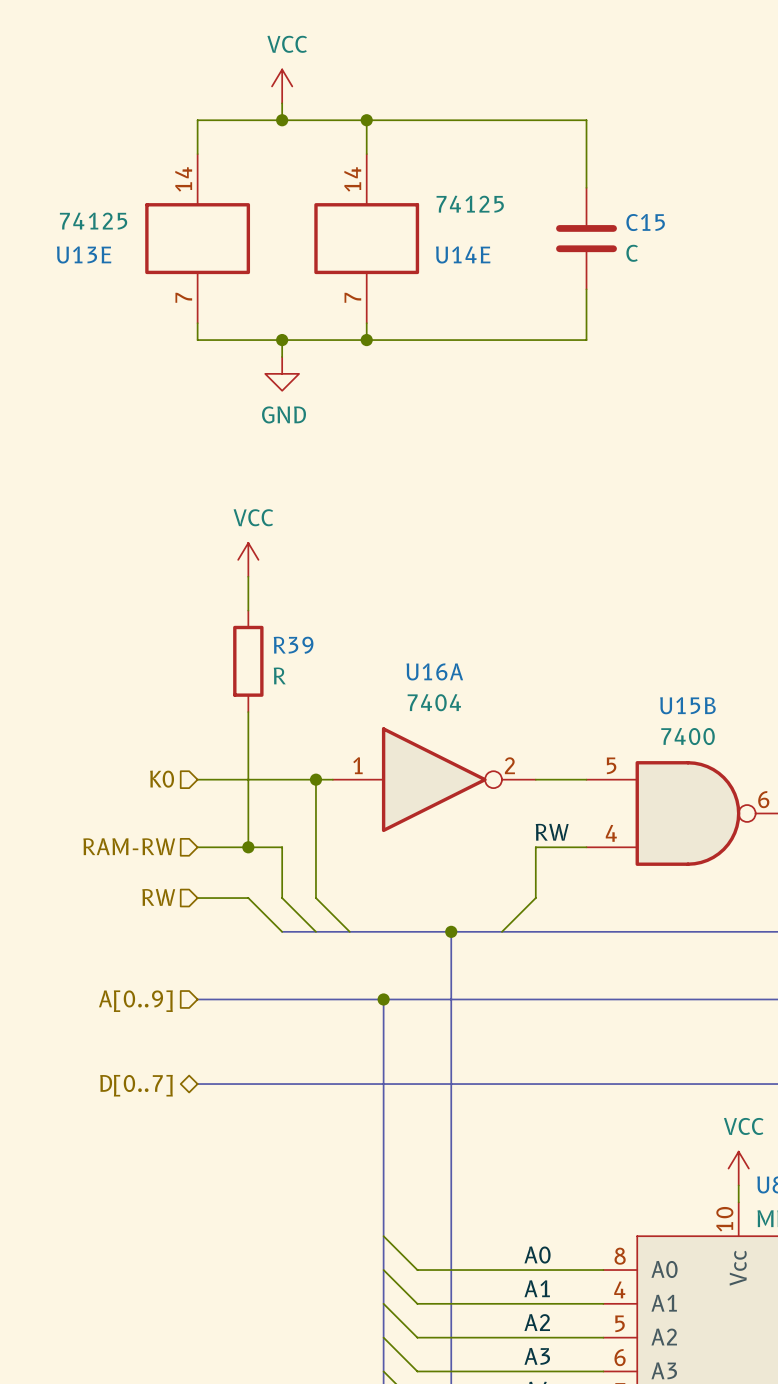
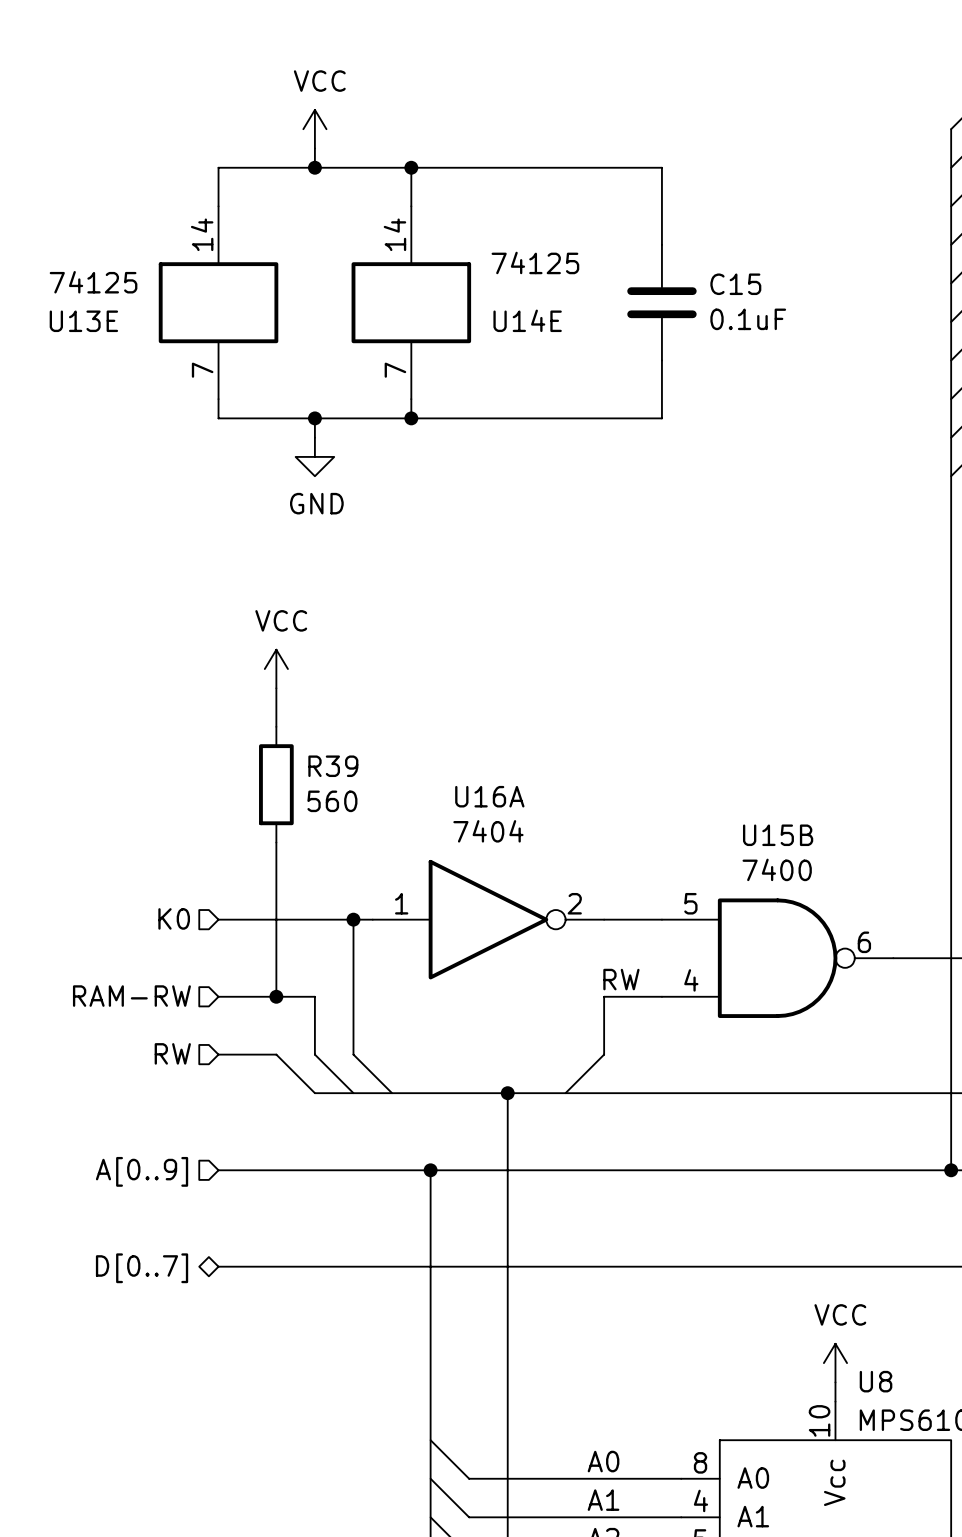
C15 value: C (632, 253) -> 0.1uF (748, 319)
R39 value: R (279, 675) -> 560 (332, 801)

